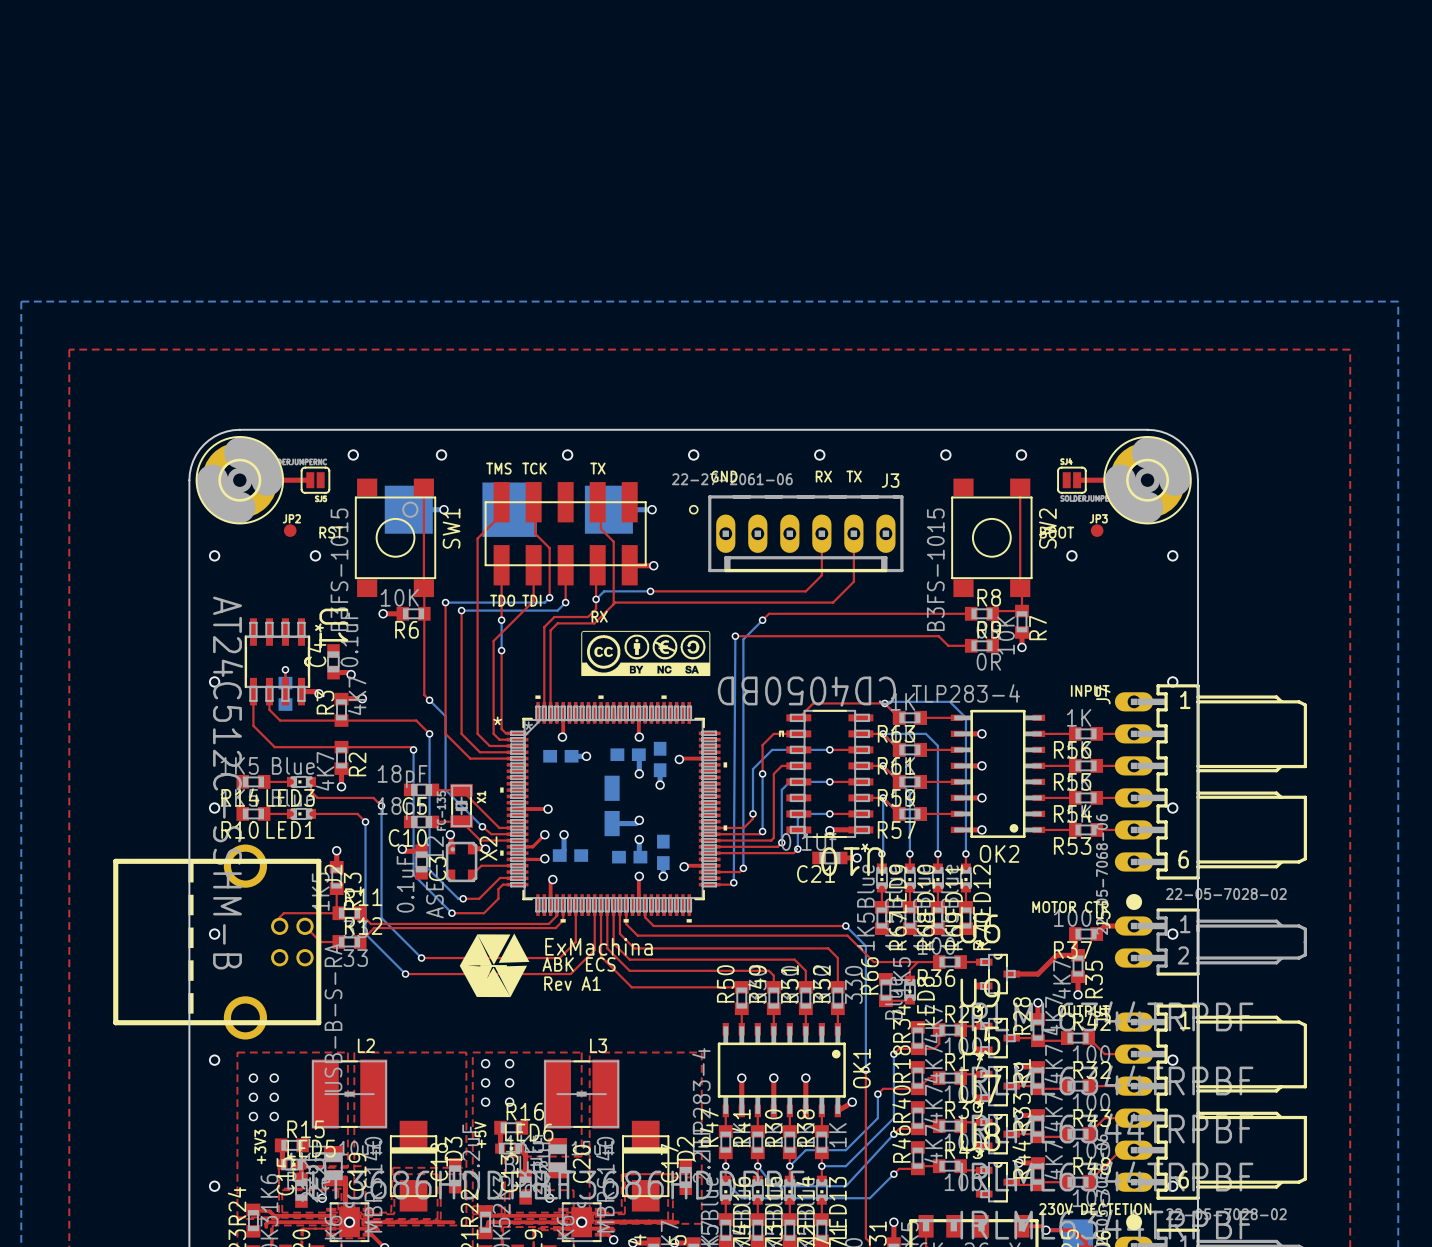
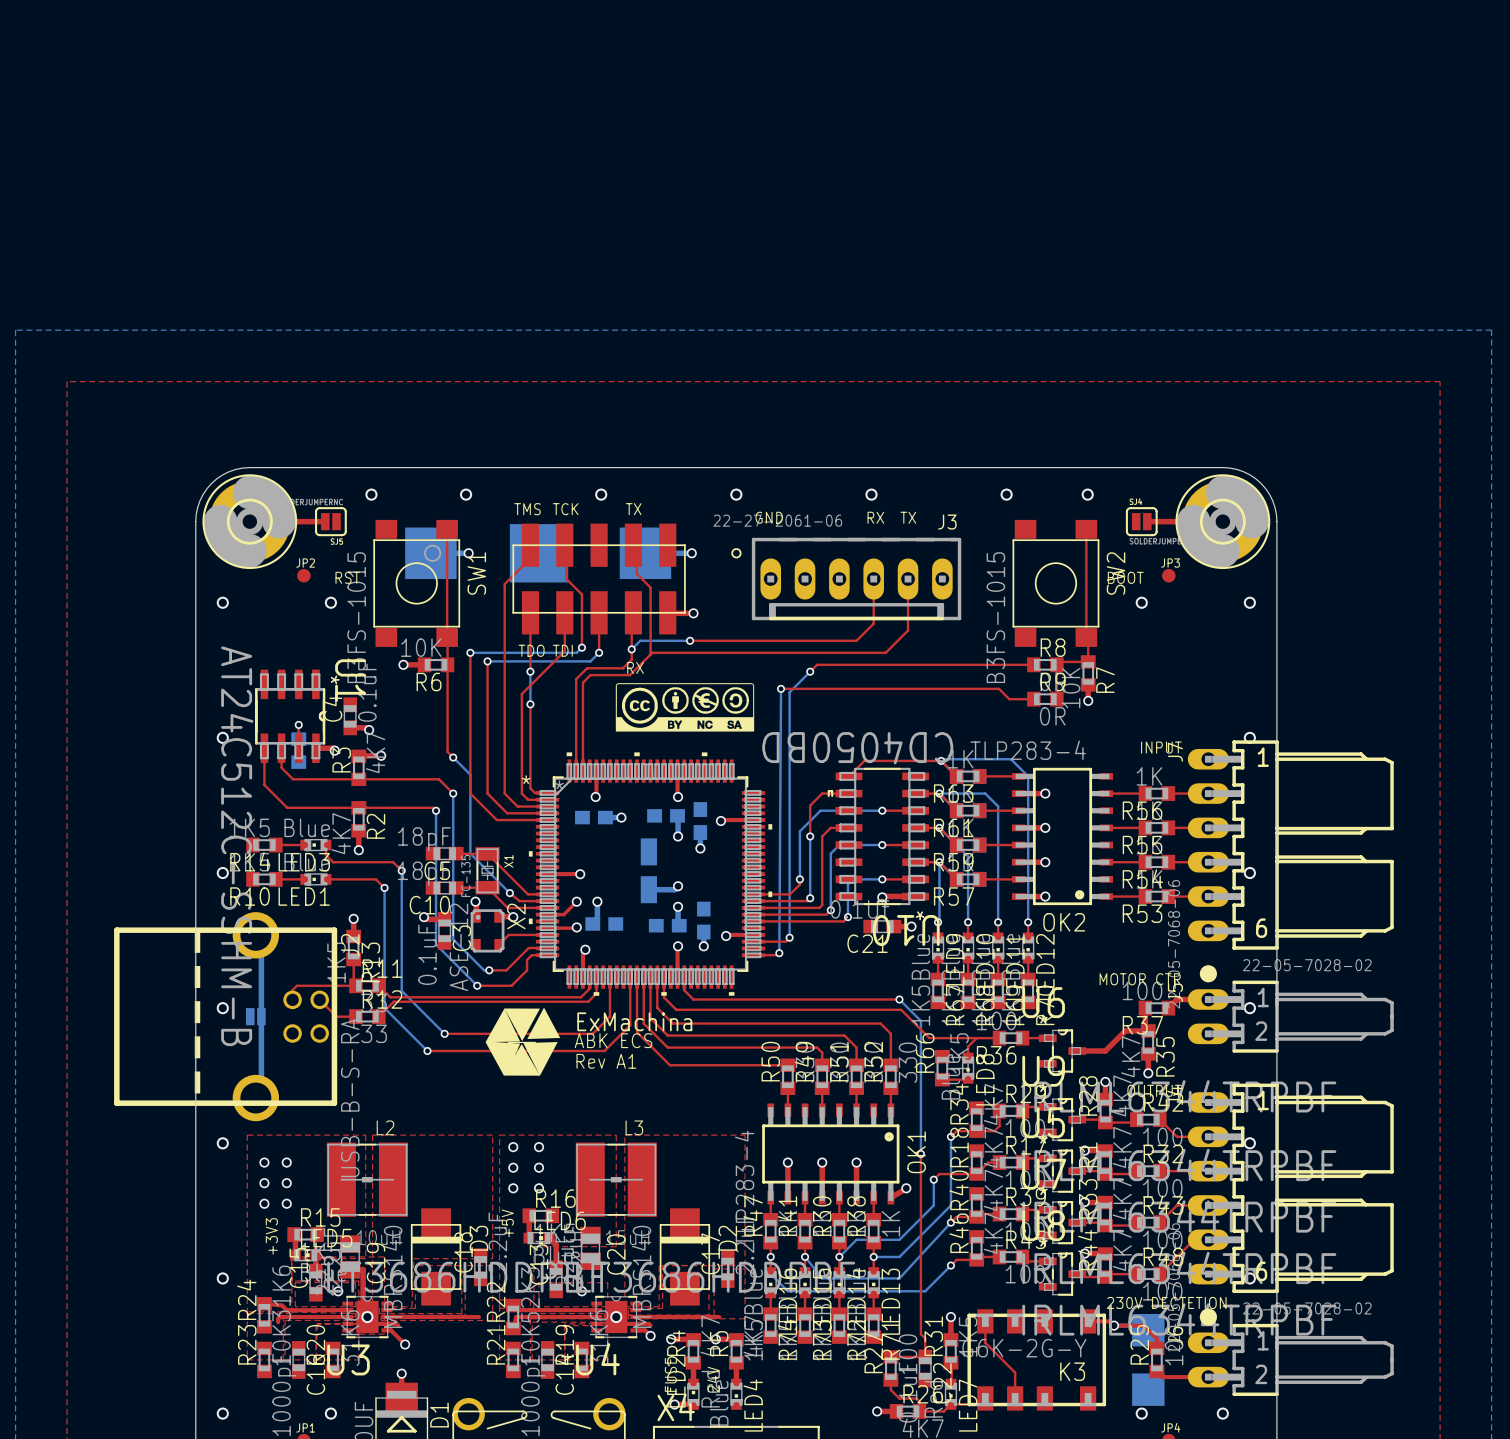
bottom track: none -> (255, 935) (261, 940) (261, 1092) (255, 1098)
part: none -> (255, 1016)

